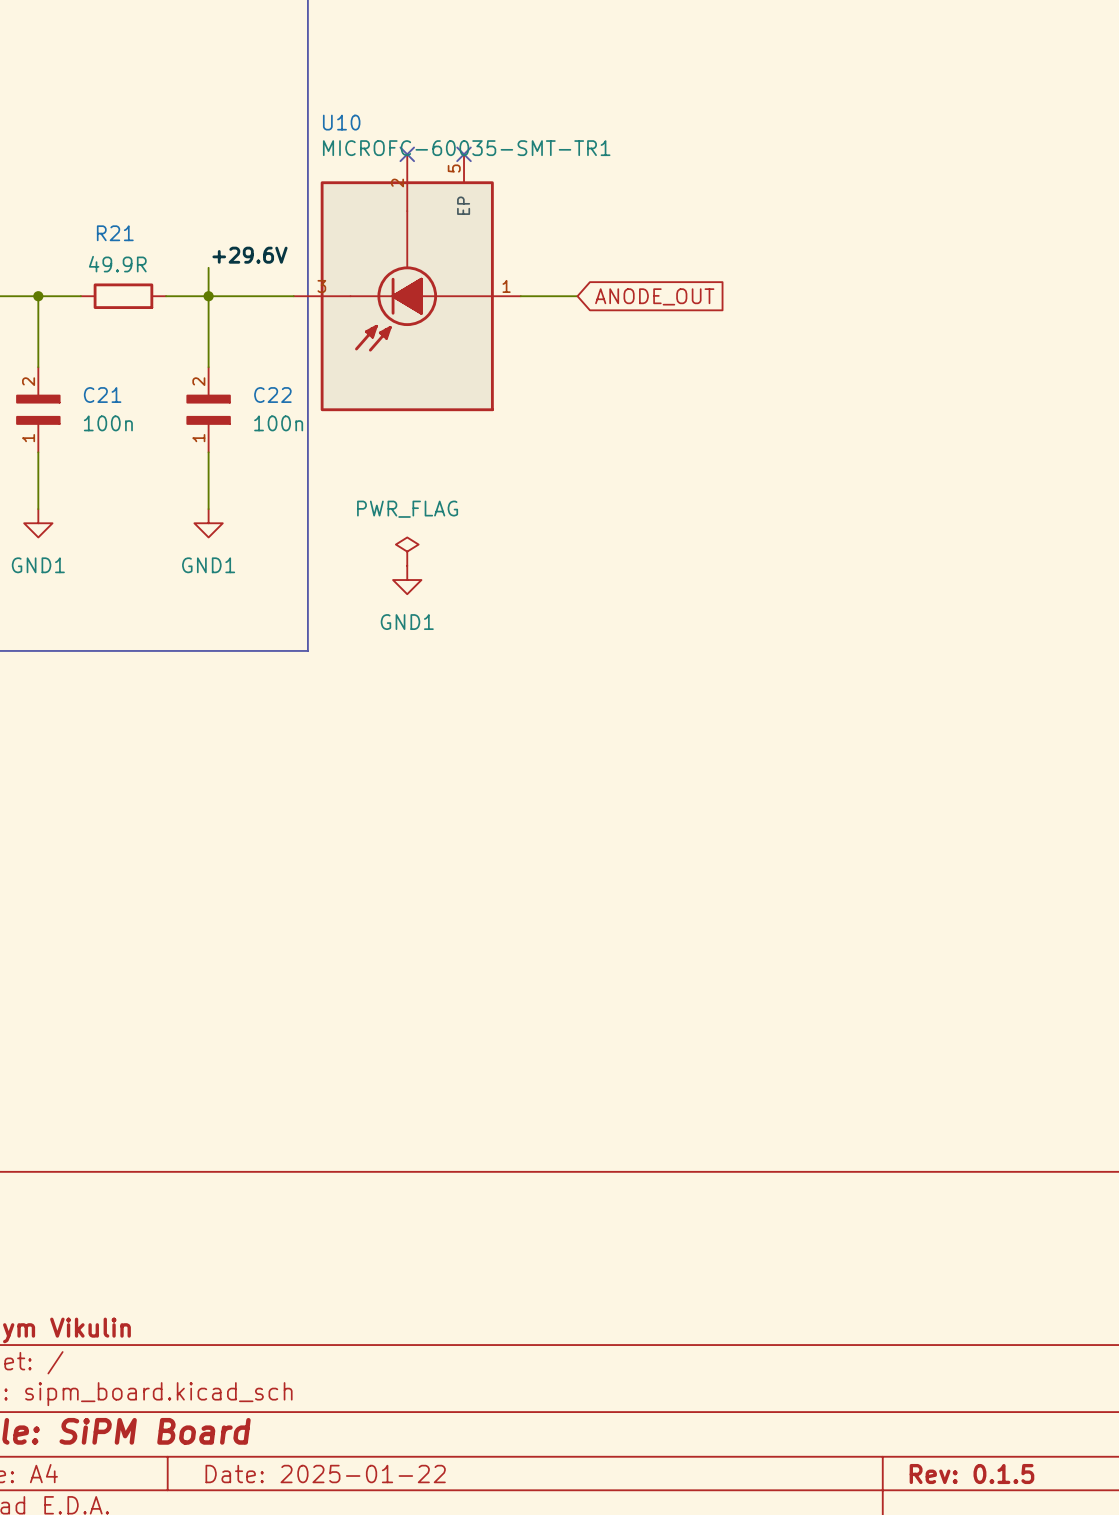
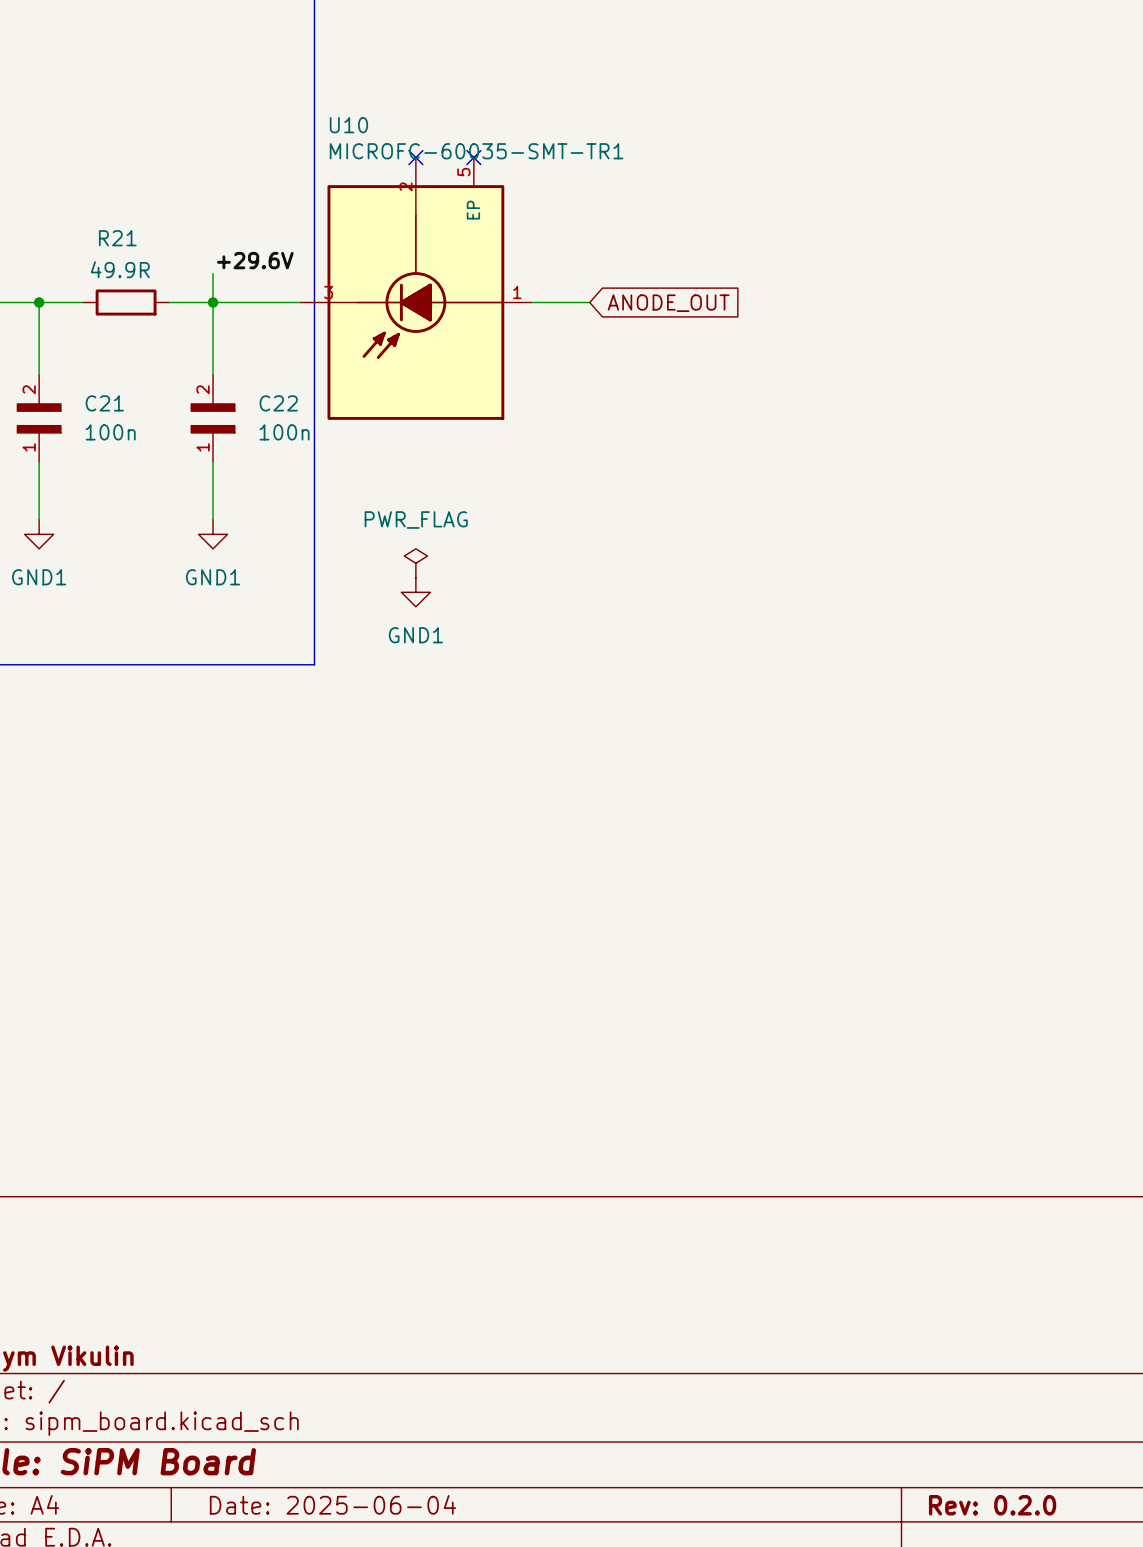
title block: Date: 2025-01-22 (325, 1474) -> Date: 2025-06-04 (332, 1504)
title block: Rev: 0.1.5 (971, 1474) -> Rev: 0.2.0 (992, 1505)

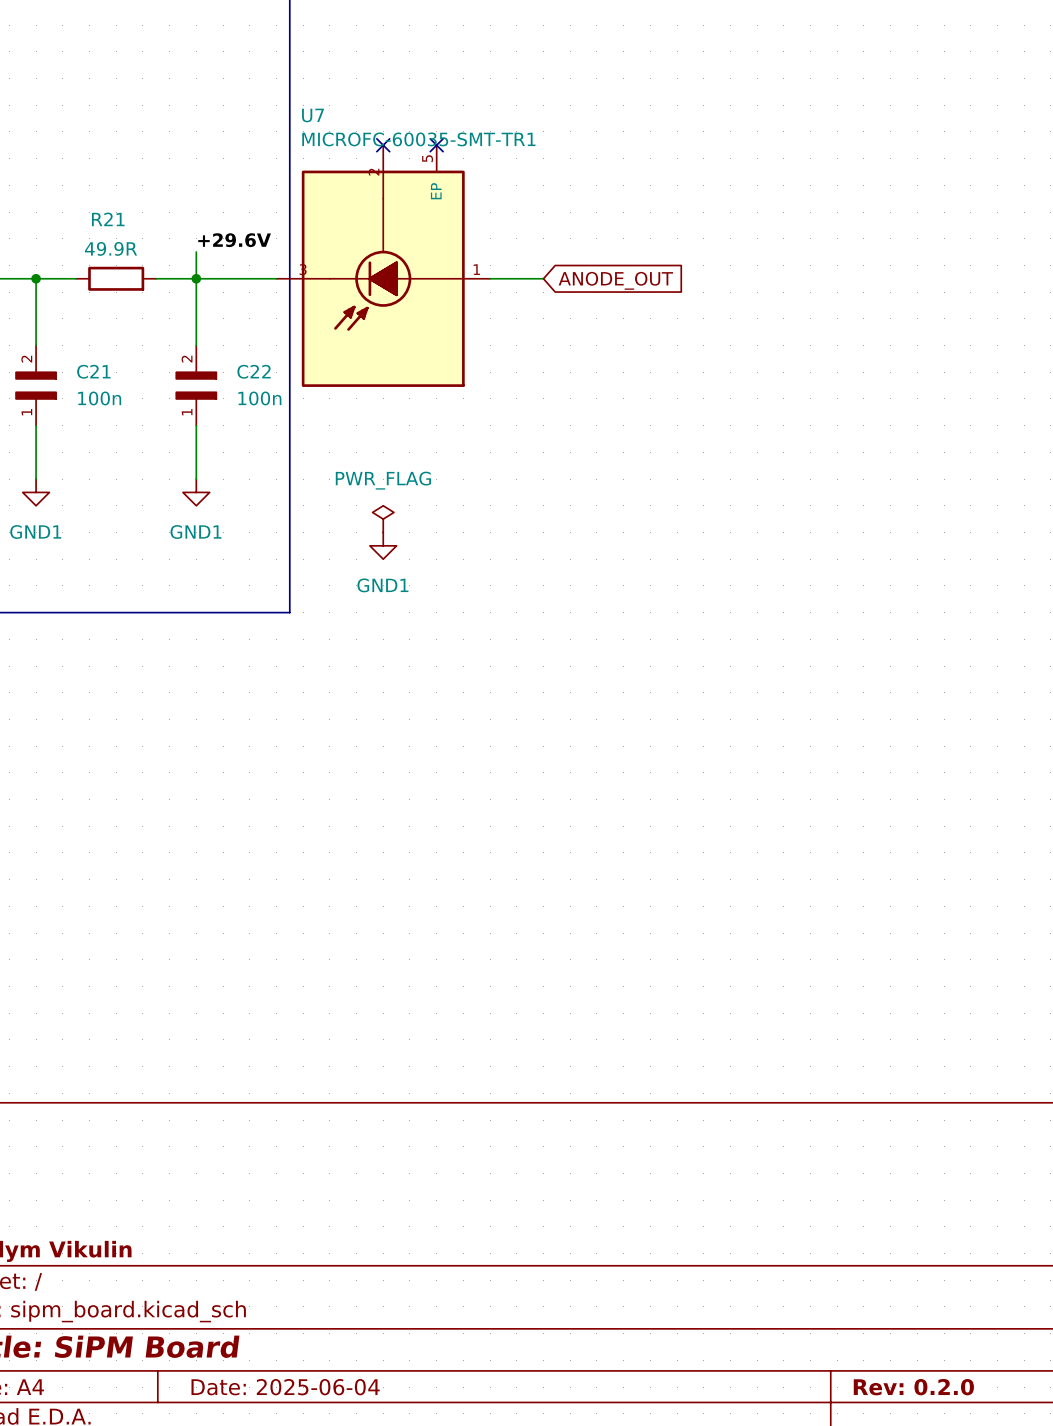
U10 name: U10 (348, 125) -> U7 (313, 115)

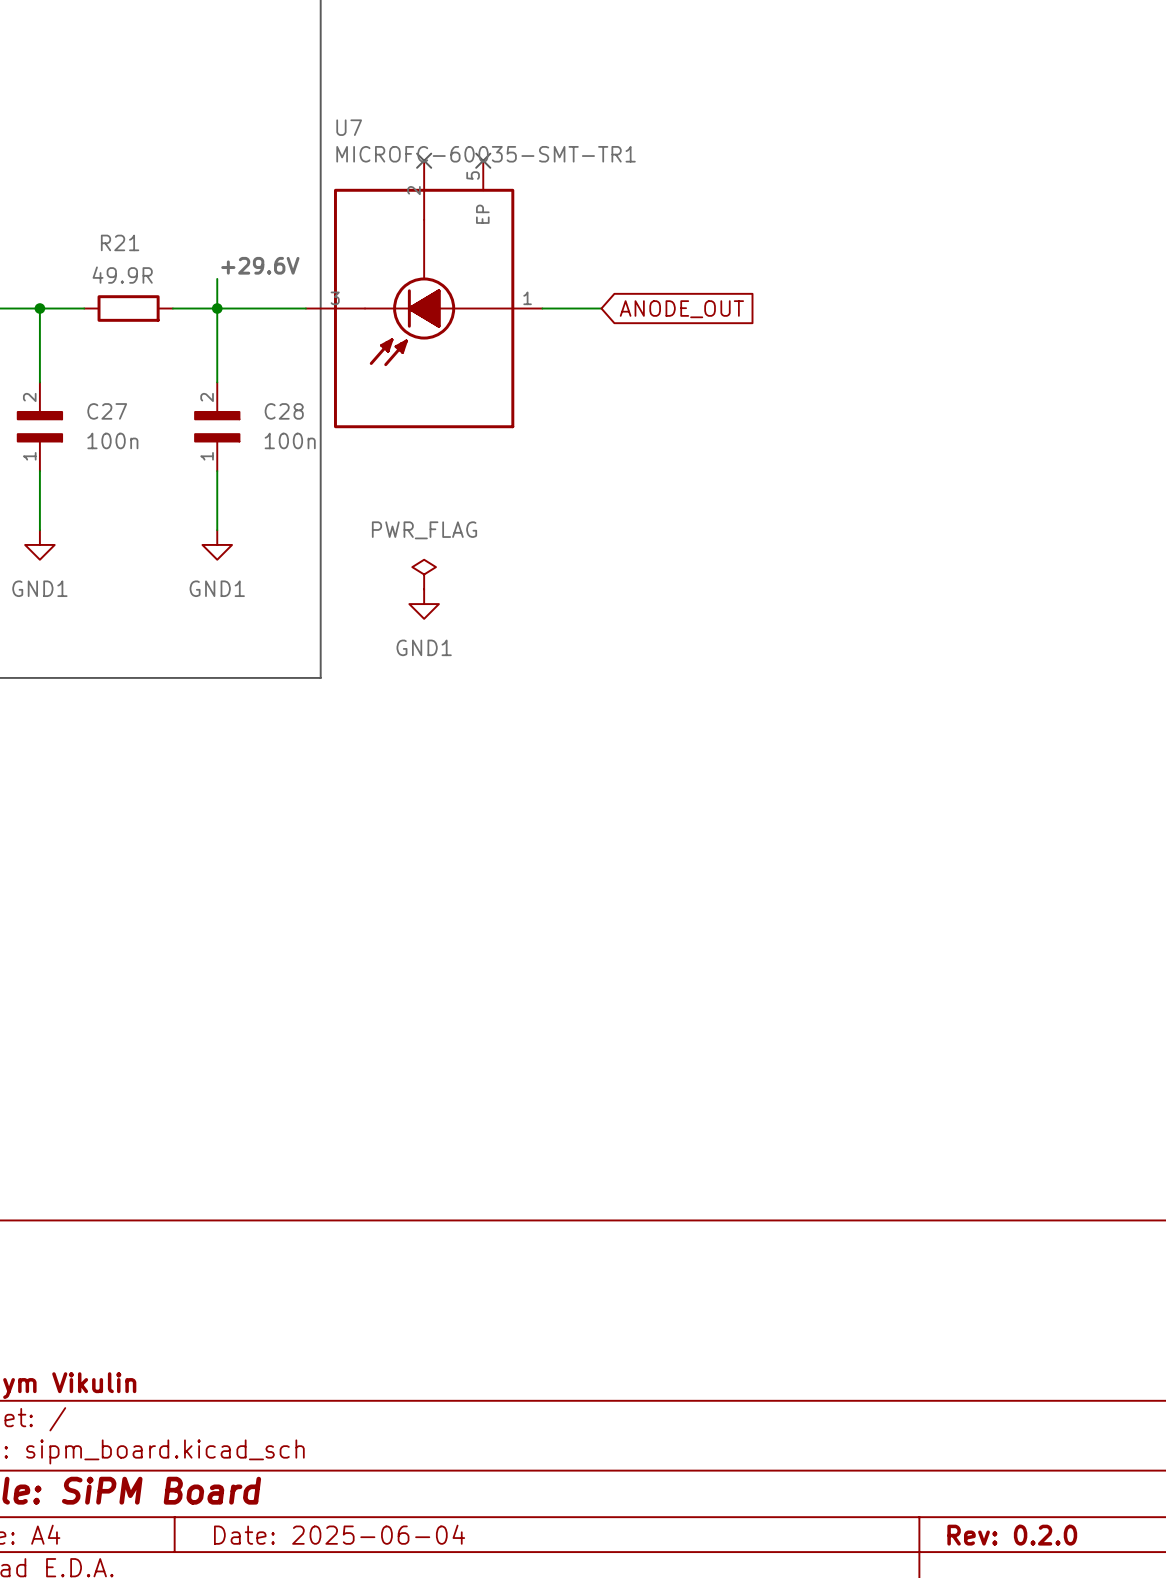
C21 name: C21 (93, 371) -> C27 (107, 411)
C22 name: C22 (254, 371) -> C28 (284, 411)

